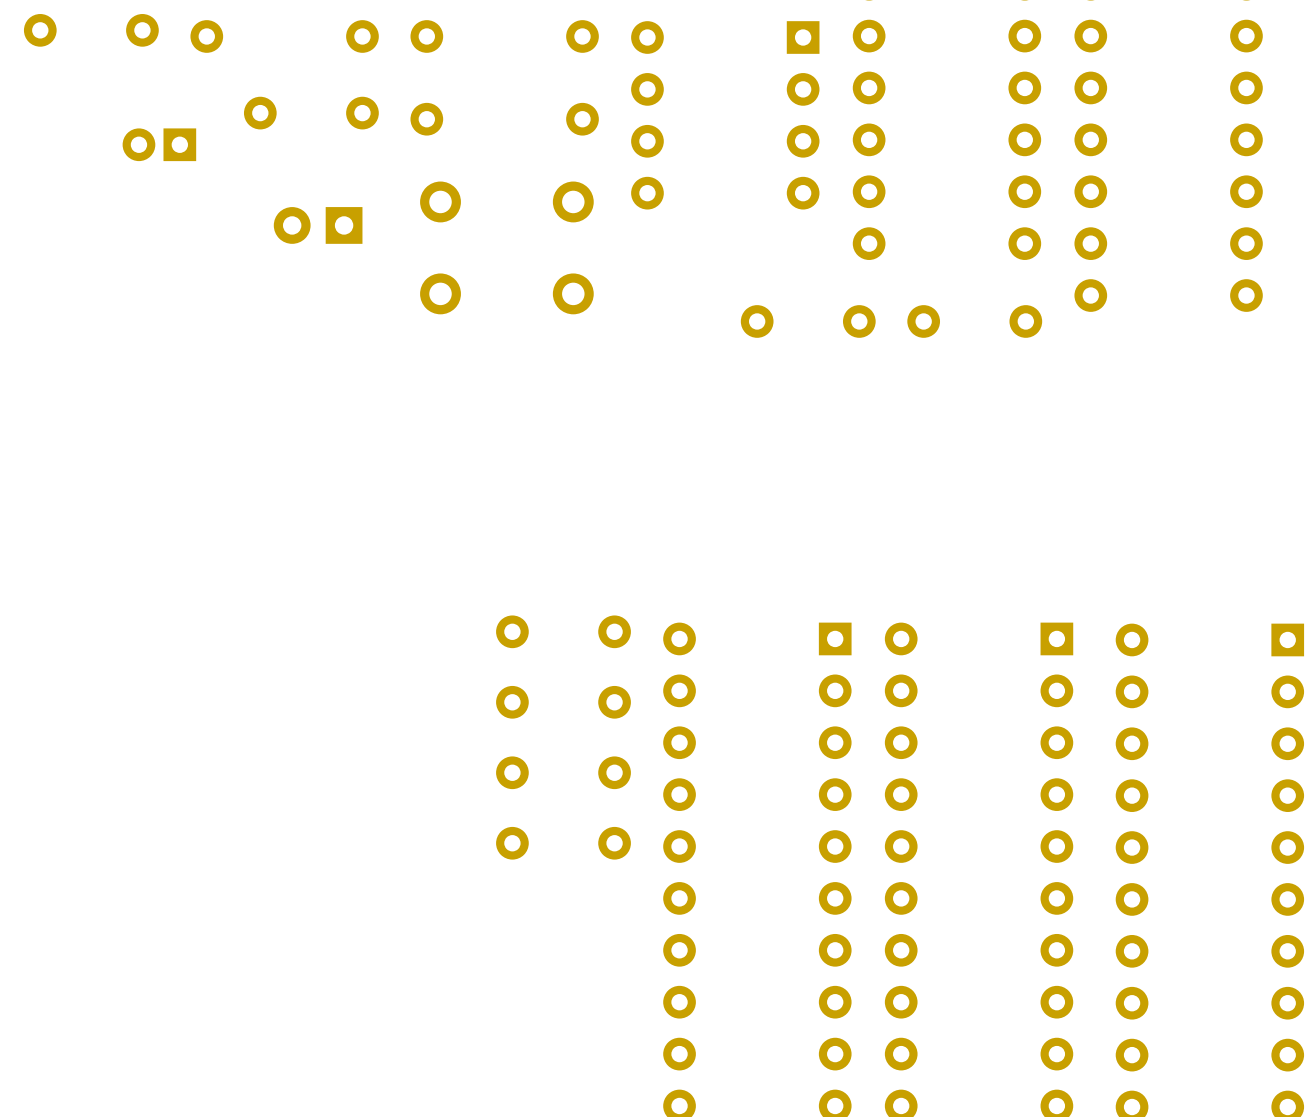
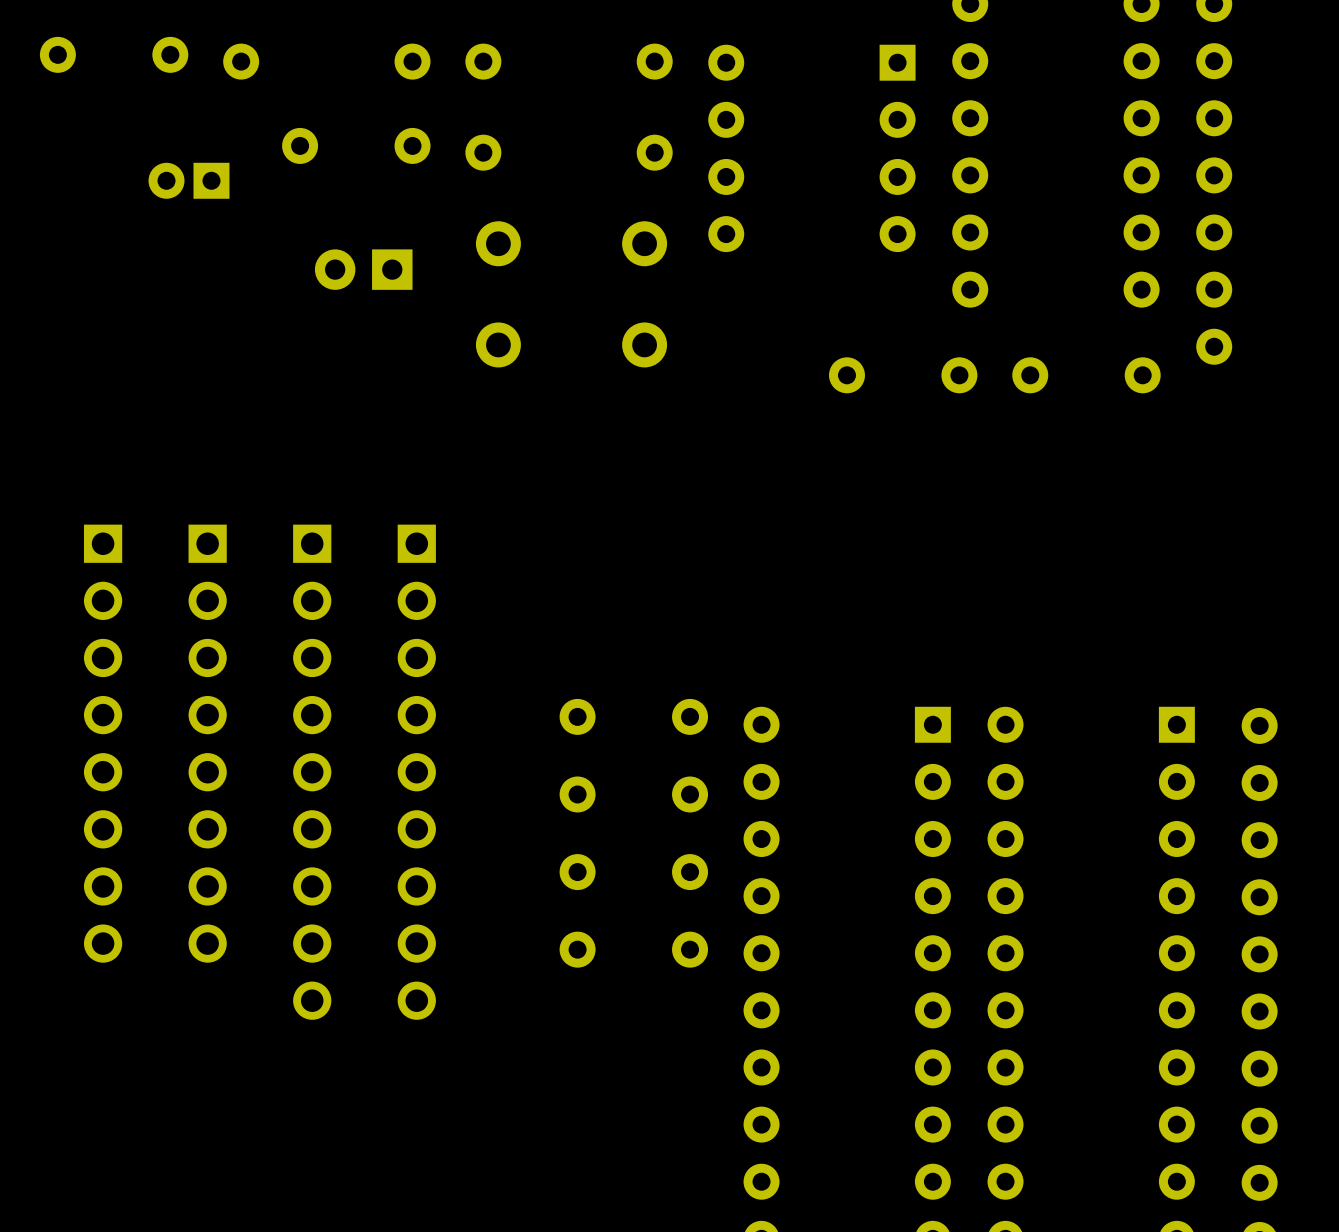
part: none -> (103, 743)
part: none -> (207, 743)
part: none -> (312, 772)
part: none -> (416, 772)

